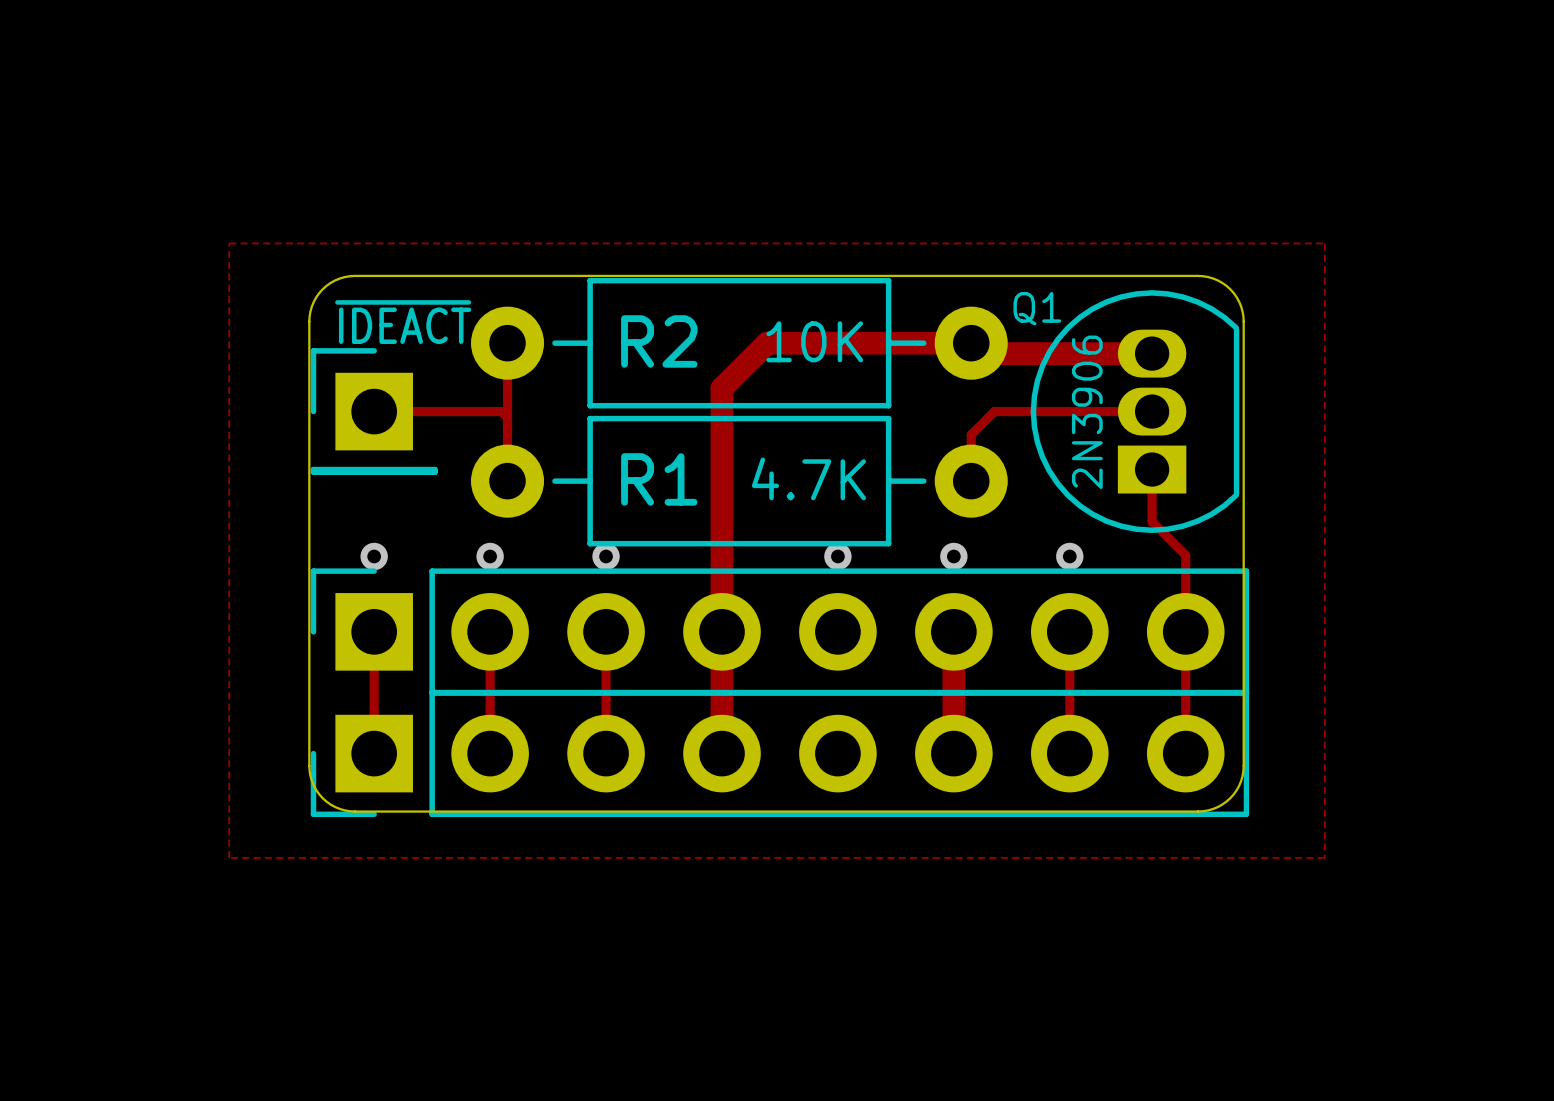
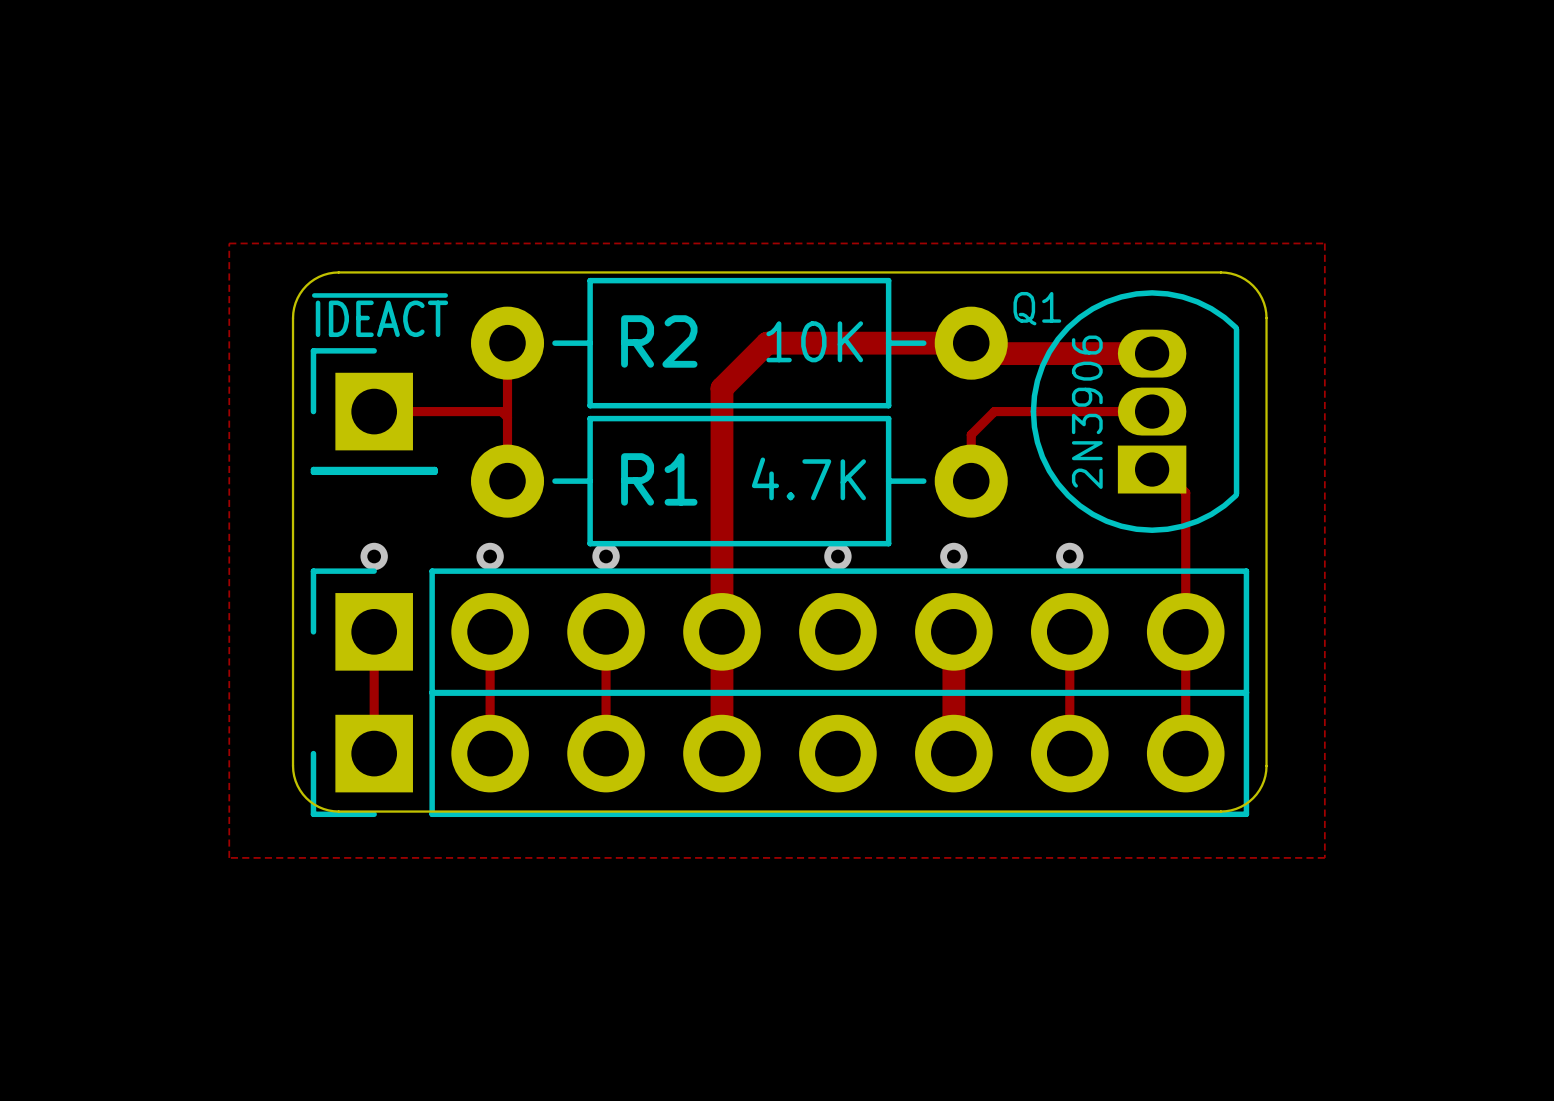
text position: ~{IDEACT} (403, 322) -> ~{IDEACT} (380, 315)
track: (1152, 469) (1152, 521) (1185, 555) -> (1162, 469) (1185, 492) (1185, 555)
board edge: (354, 811) (335, 807) (322, 798) (311, 780) (309, 765) (309, 316) (313, 301) (322, 289) (335, 280) (354, 275) (1198, 275) (1208, 277) (1222, 282) (1233, 293) (1239, 301) (1243, 321) (1243, 765) (1239, 785) (1230, 798) (1213, 808) (1198, 811) -> (354, 811) (328, 810) (314, 804) (300, 790) (293, 771) (293, 318) (294, 307) (300, 293) (314, 279) (328, 273) (338, 272) (1220, 272) (1235, 275) (1253, 285) (1262, 298) (1266, 312) (1266, 765) (1262, 785) (1253, 798) (1245, 804) (1225, 811) (1198, 811)

